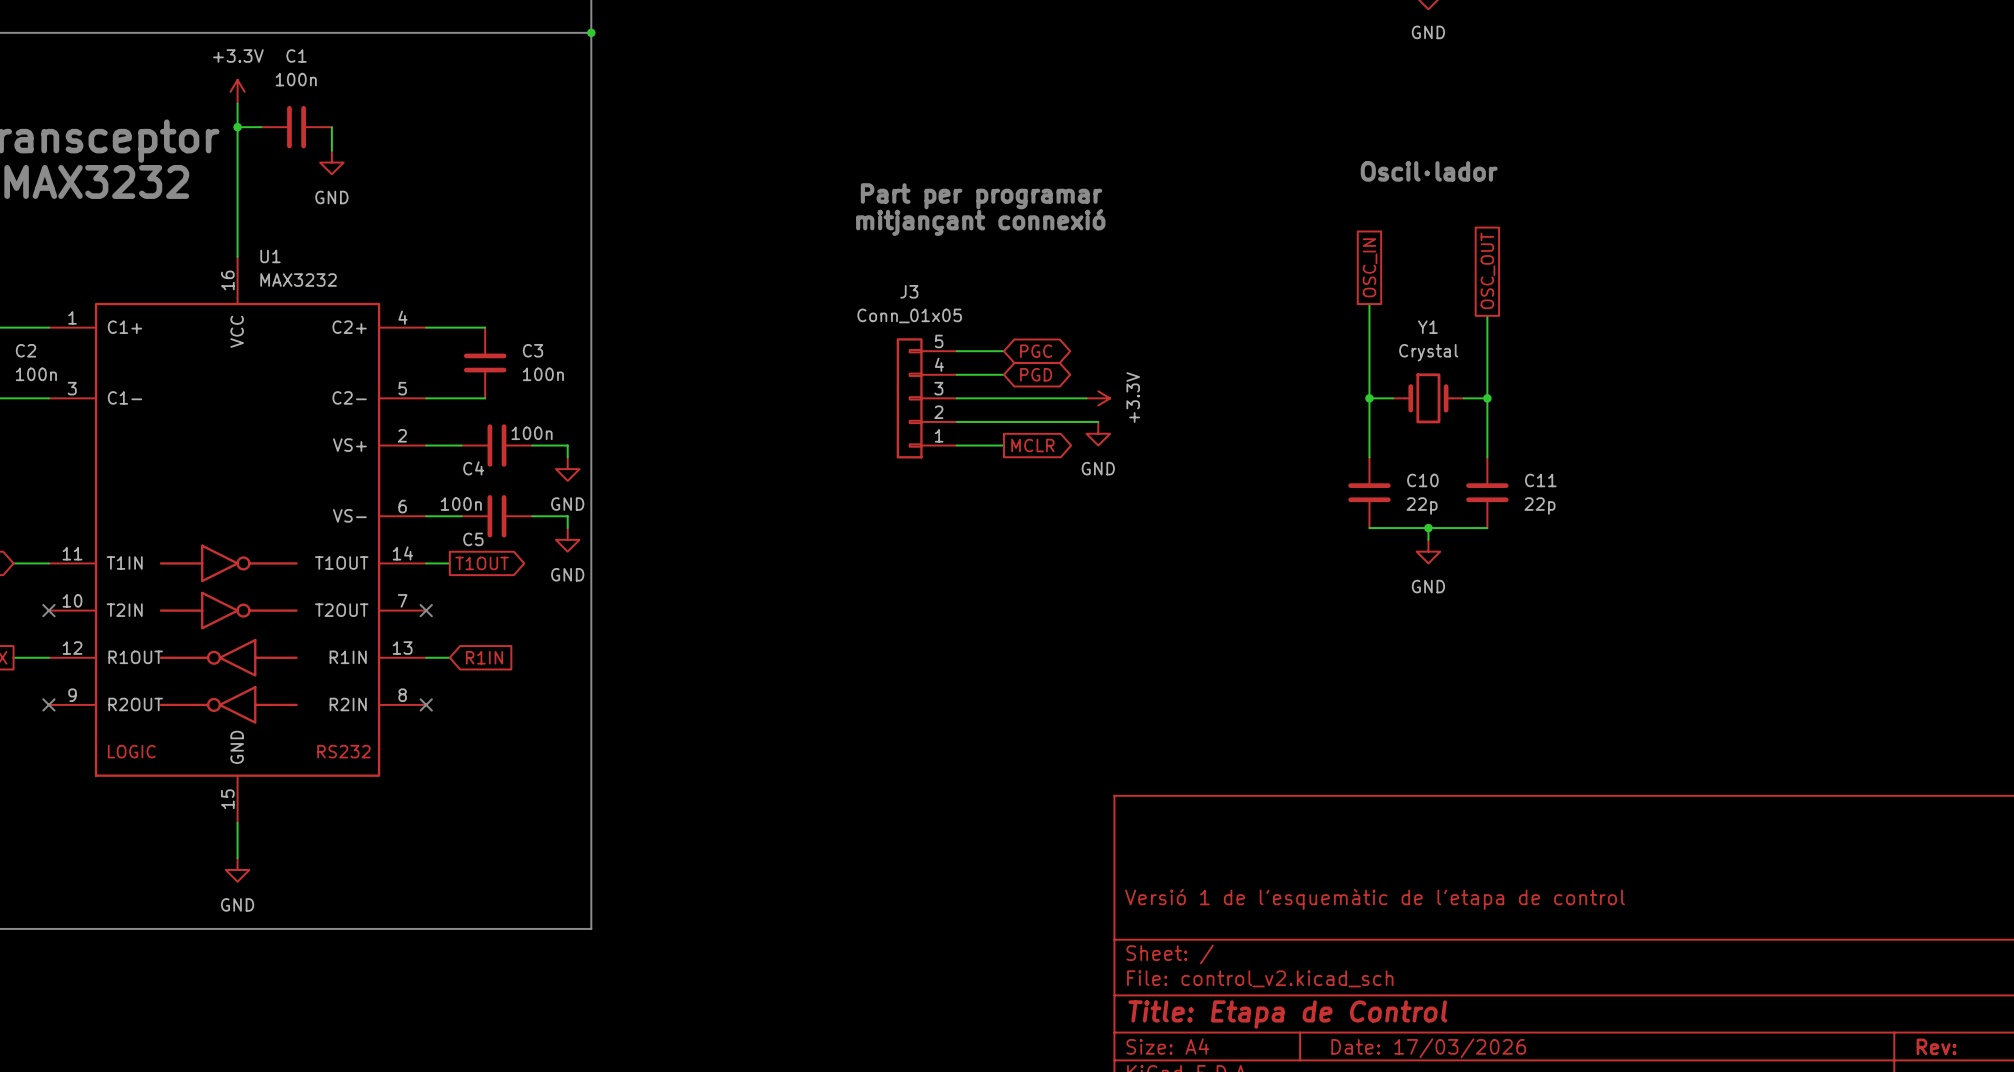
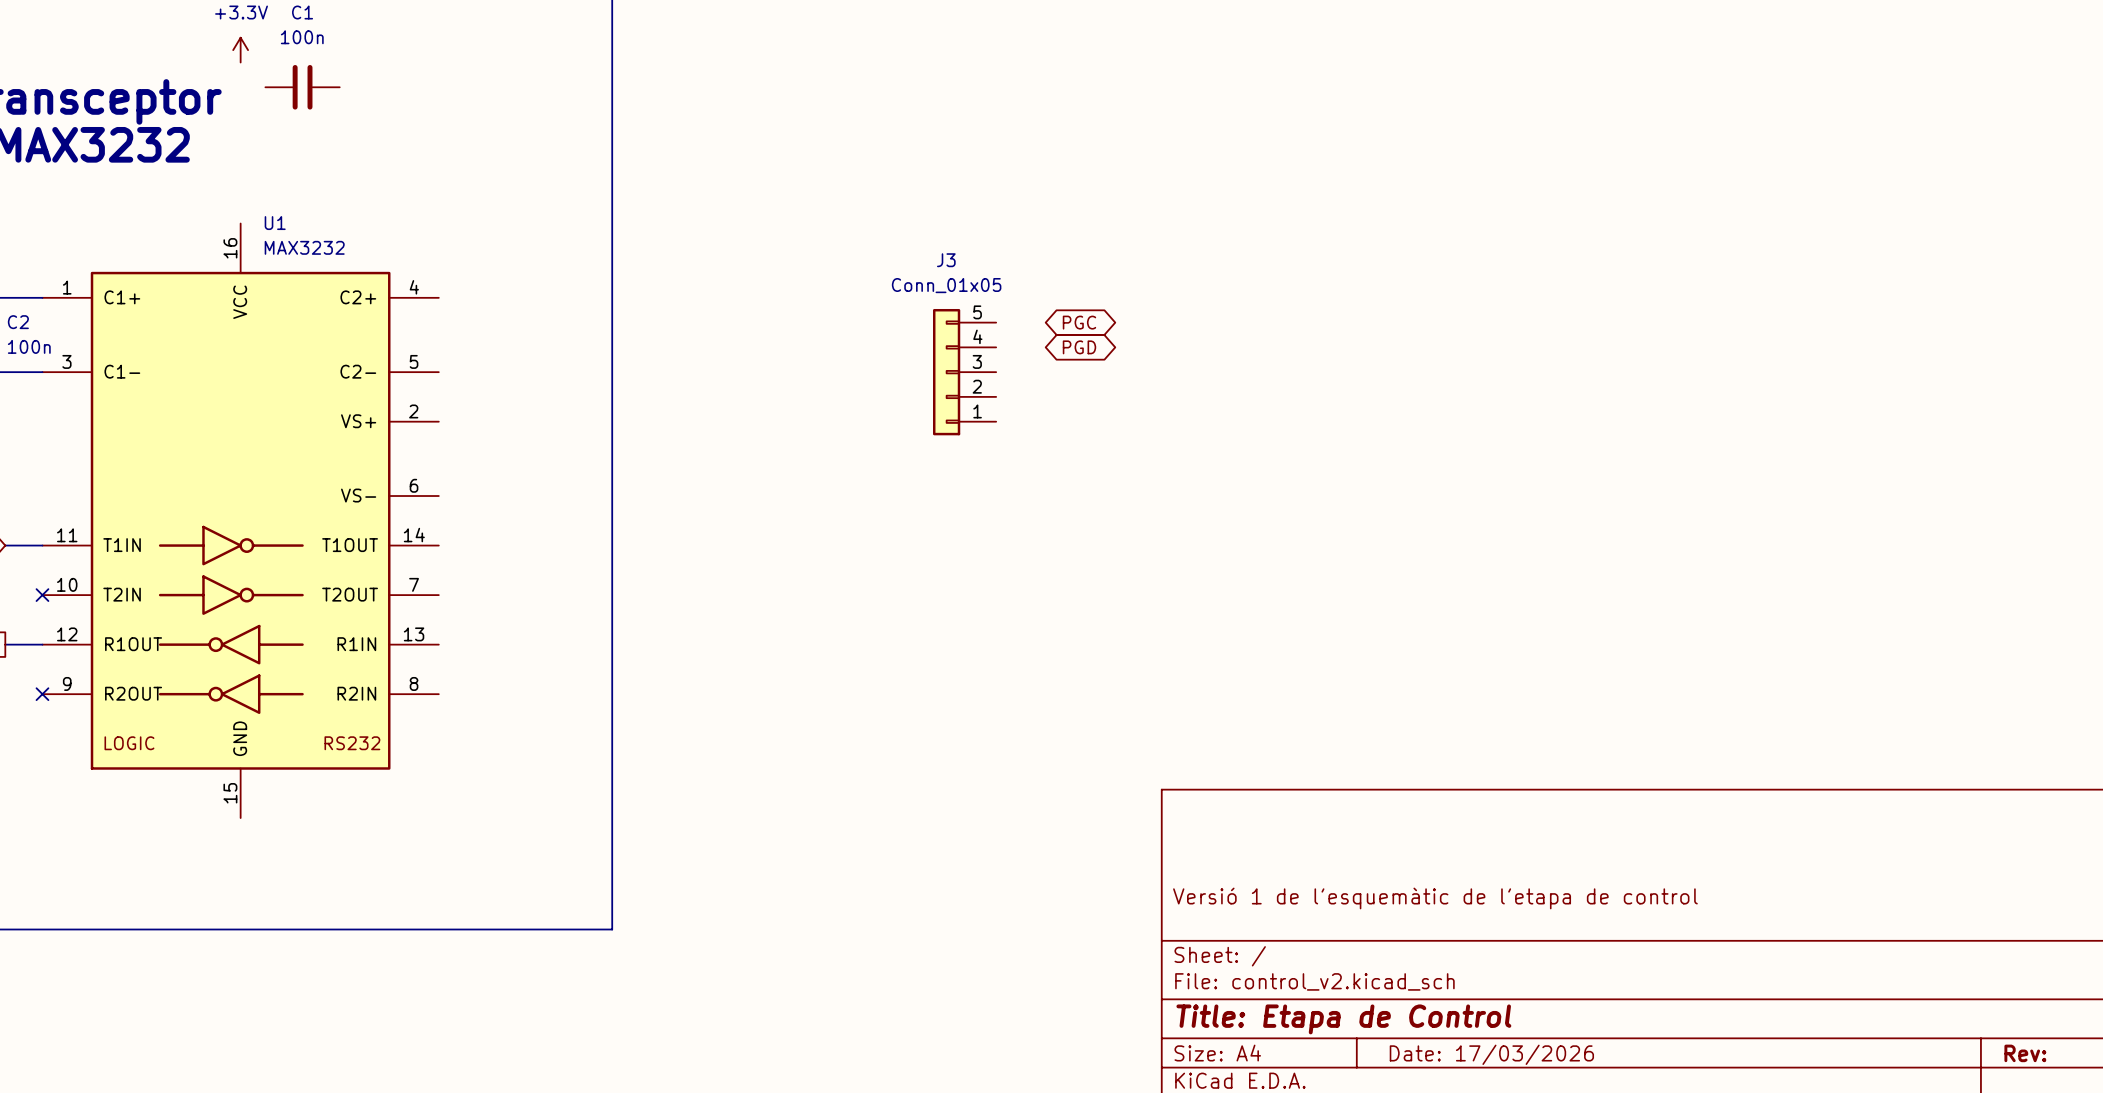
wire: (237, 103) (237, 256) -> none
wire: (237, 127) (261, 127) -> none
junction: (237, 127) -> none
wire: (331, 127) (331, 150) -> none
power symbol: GND (331, 162) -> none
text: Oscil·lador (1429, 171) -> none
text: Part per programar (981, 196) -> none
text: mitjançant connexió (980, 222) -> none
global label: OSC_IN (1370, 267) -> none
global label: OSC_OUT (1487, 270) -> none
wire: (1369, 304) (1369, 457) -> none
wire: (1487, 315) (1487, 457) -> none
wire: (426, 327) (485, 327) -> none
wire: (956, 351) (1003, 351) -> none
C3: 100n (485, 362) -> none
wire: (956, 374) (1003, 374) -> none
wire: (426, 398) (485, 398) -> none
wire: (956, 398) (1086, 398) -> none
power symbol: +3.3V (1098, 398) -> none
wire: (1369, 398) (1393, 398) -> none
junction: (1369, 398) -> none
Y1: Crystal (1428, 398) -> none
wire: (1463, 398) (1487, 398) -> none
junction: (1487, 398) -> none
wire: (956, 421) (1098, 421) -> none
power symbol: GND (1098, 433) -> none
wire: (426, 445) (461, 445) -> none
C4: 100n (496, 445) -> none
wire: (532, 445) (567, 445) (567, 457) -> none
wire: (956, 445) (1003, 445) -> none
global label: MCLR (1032, 445) -> none
power symbol: GND (567, 469) -> none
C10: 22p (1369, 492) -> none
C11: 22p (1487, 492) -> none
wire: (426, 516) (461, 516) -> none
C5: 100n (496, 516) -> none
wire: (532, 516) (567, 516) (567, 528) -> none
wire: (1369, 528) (1487, 528) -> none
wire: (1428, 528) (1428, 539) -> none
junction: (1428, 528) -> none
power symbol: GND (567, 539) -> none
power symbol: GND (1428, 551) -> none
wire: (426, 563) (449, 563) -> none
global label: T1OUT (482, 563) -> none
no-connect mark: (426, 610) -> none
wire: (426, 657) (449, 657) -> none
global label: R1IN (484, 657) -> none
no-connect mark: (426, 704) -> none
wire: (237, 822) (237, 858) -> none
power symbol: GND (237, 869) -> none

